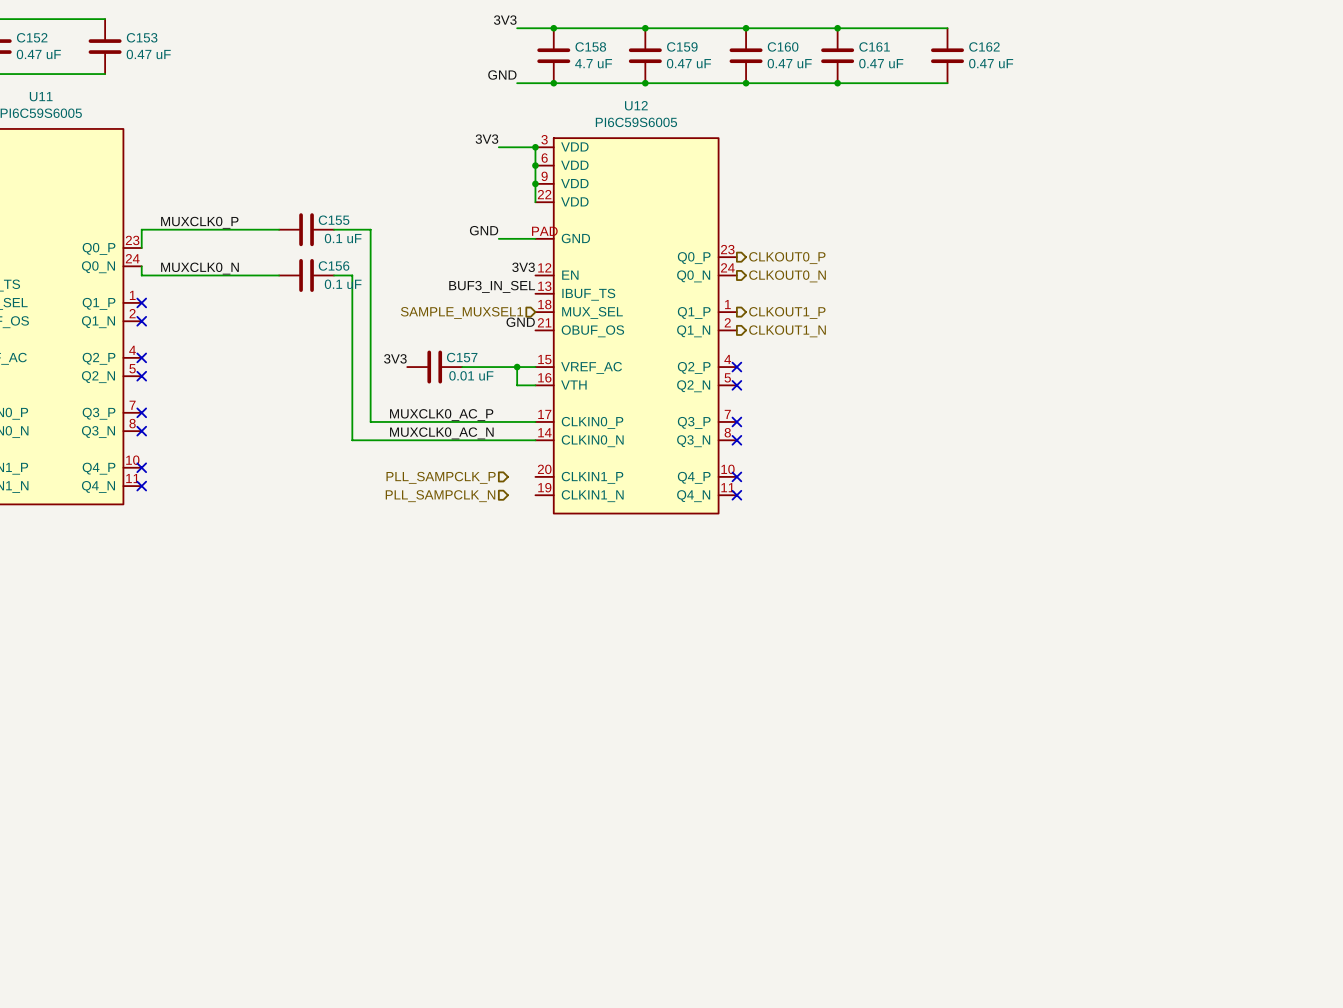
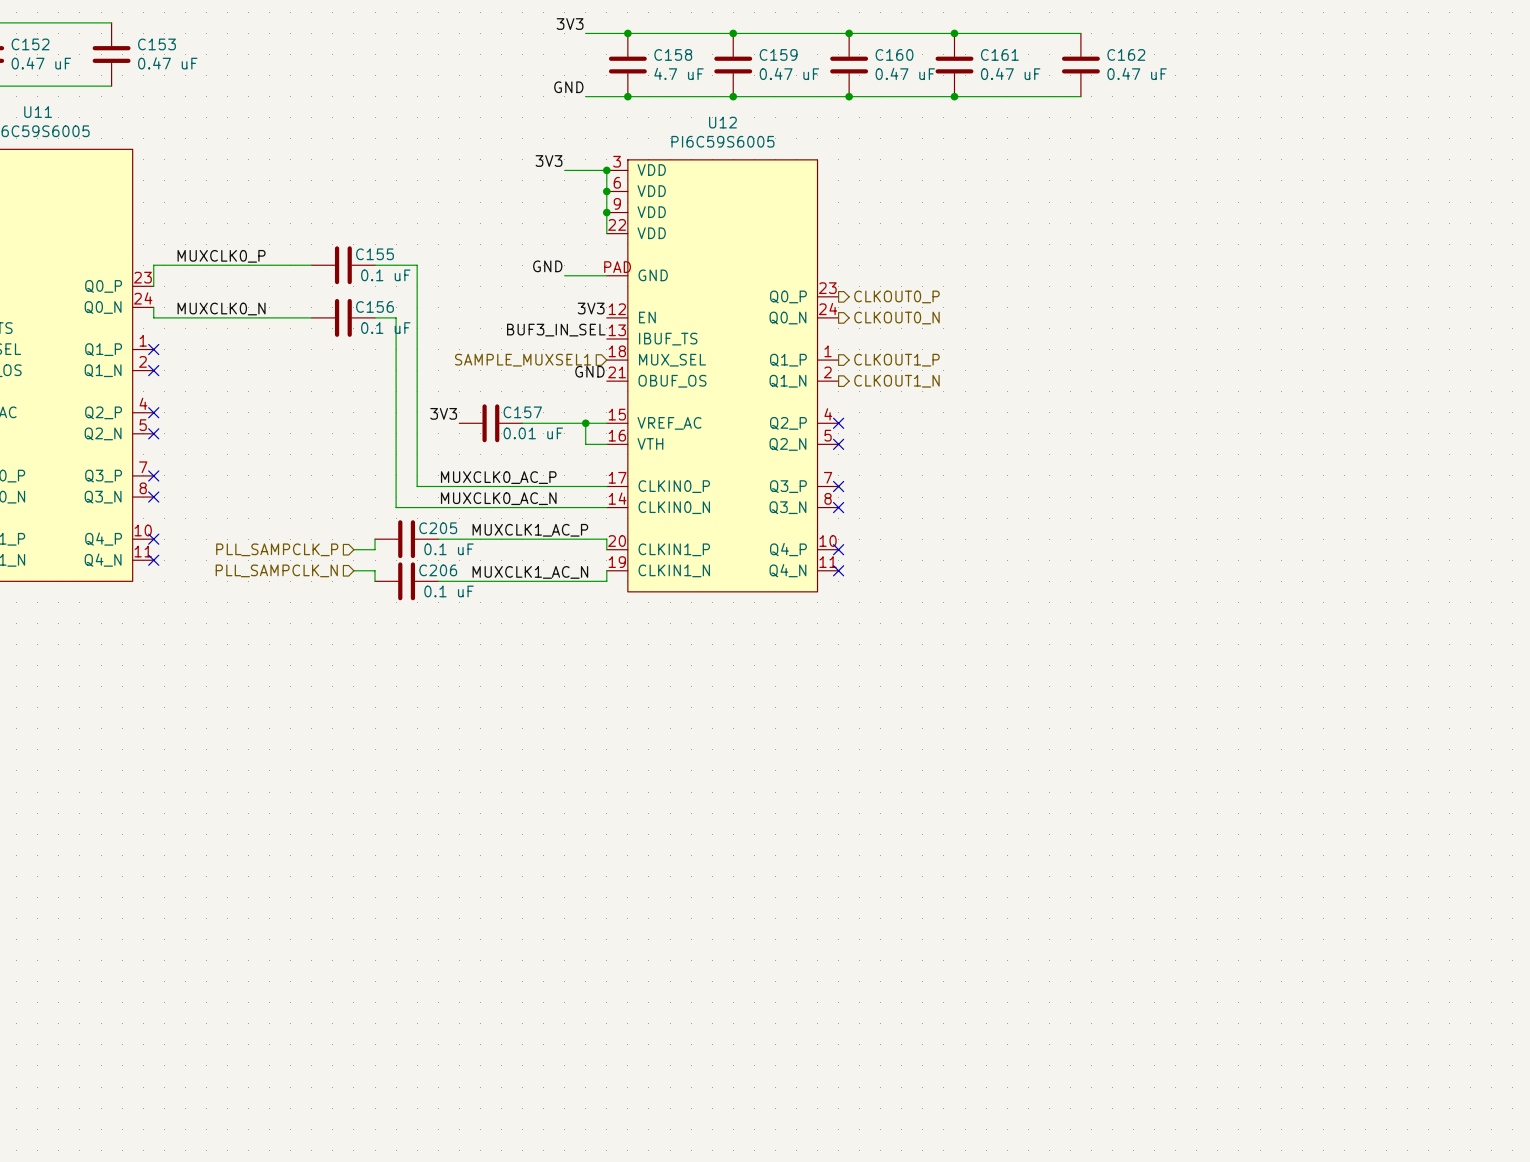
label: none -> MUXCLK1_AC_P (530, 530)
wire: none -> (375, 539) (375, 549) (353, 549)
C205: none -> 0.1 uF (406, 539)
wire: none -> (438, 539) (606, 539) (606, 549)
hierarchical label: none -> PLL_SAMPCLK_P (277, 549)
hierarchical label: PLL_SAMPCLK_P (441, 477) -> none
wire: none -> (353, 570) (375, 570) (375, 581)
wire: none -> (606, 570) (606, 581) (438, 581)
hierarchical label: none -> PLL_SAMPCLK_N (276, 570)
hierarchical label: PLL_SAMPCLK_N (440, 496) -> none
label: none -> MUXCLK1_AC_N (530, 572)
C206: none -> 0.1 uF (406, 581)

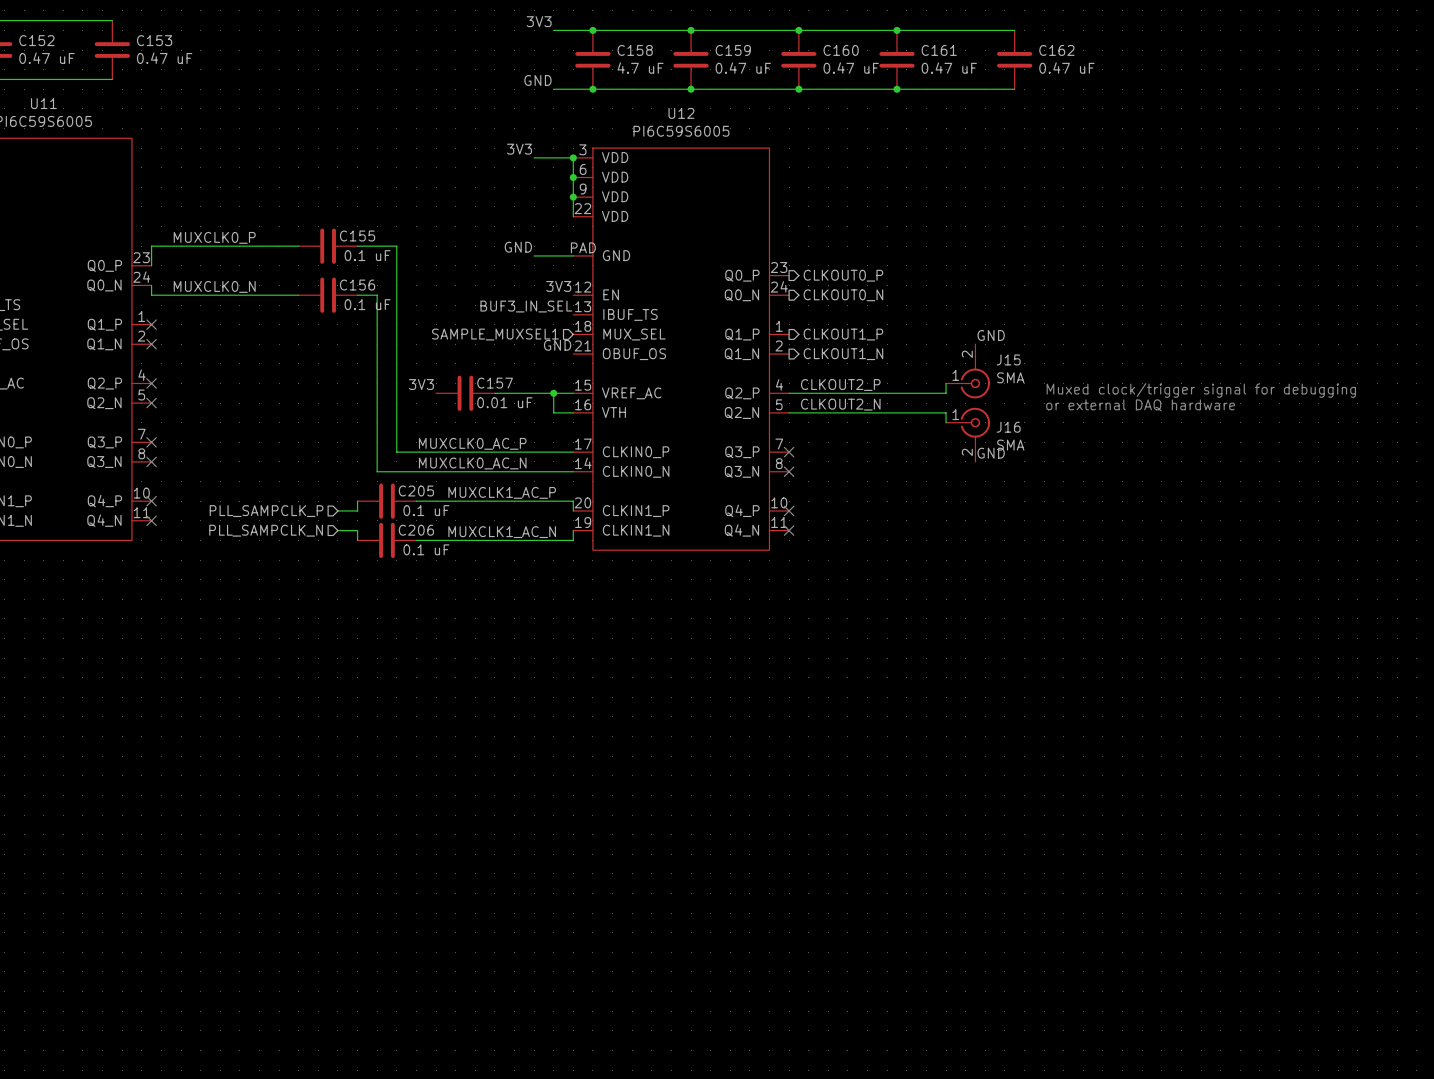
label: none -> GND (991, 335)
J15: none -> SMA (968, 371)
wire: none -> (946, 383) (946, 393) (789, 393)
label: none -> CLKOUT2_P (840, 385)
text: none -> Muxed clock/trigger signal for debugging (1201, 390)
no-connect mark: (838, 423) -> none
label: none -> CLKOUT2_N (840, 404)
text: none -> or external DAQ hardware (1140, 405)
wire: none -> (789, 412) (946, 412) (946, 422)
no-connect mark: (838, 444) -> none
J16: none -> SMA (968, 434)
label: none -> GND (991, 453)

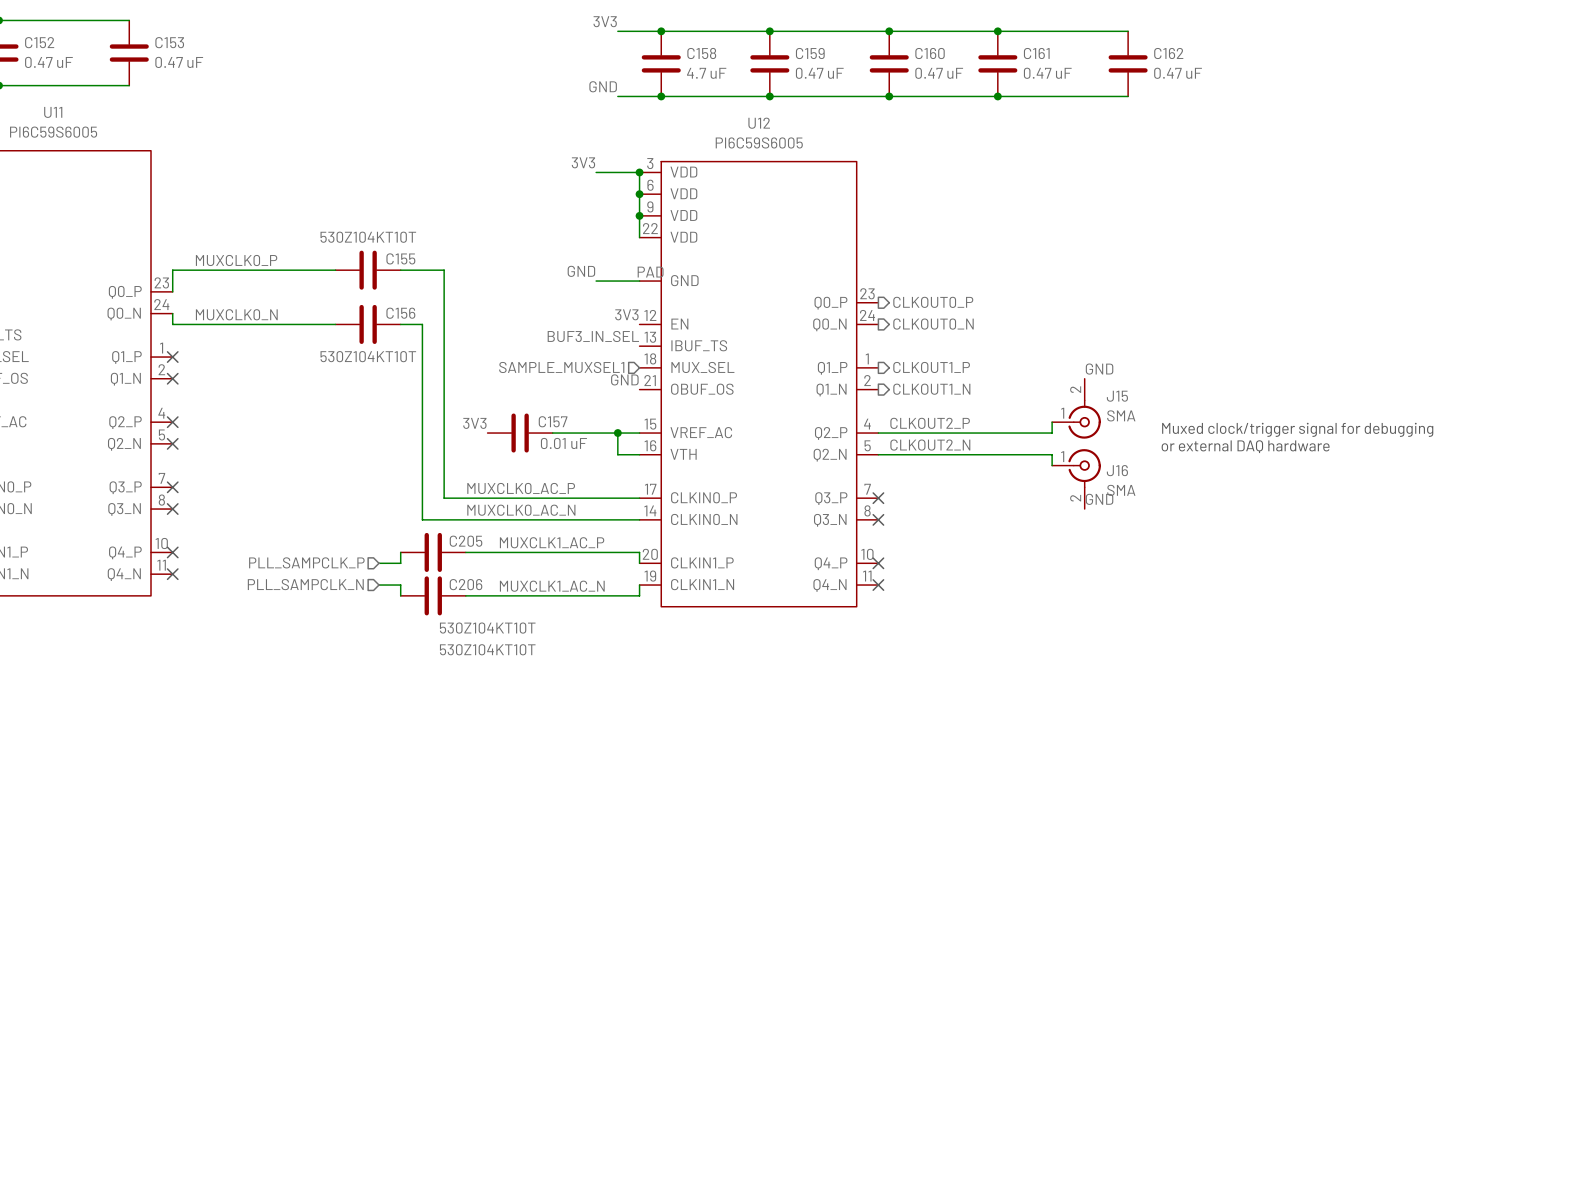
C155 value: 0.1 uF (367, 255) -> 530Z104KT10T (368, 237)
C156 value: 0.1 uF (367, 304) -> 530Z104KT10T (368, 356)
C205 value: 0.1 uF (426, 510) -> 530Z104KT10T (487, 628)
C206 value: 0.1 uF (426, 549) -> 530Z104KT10T (487, 649)

